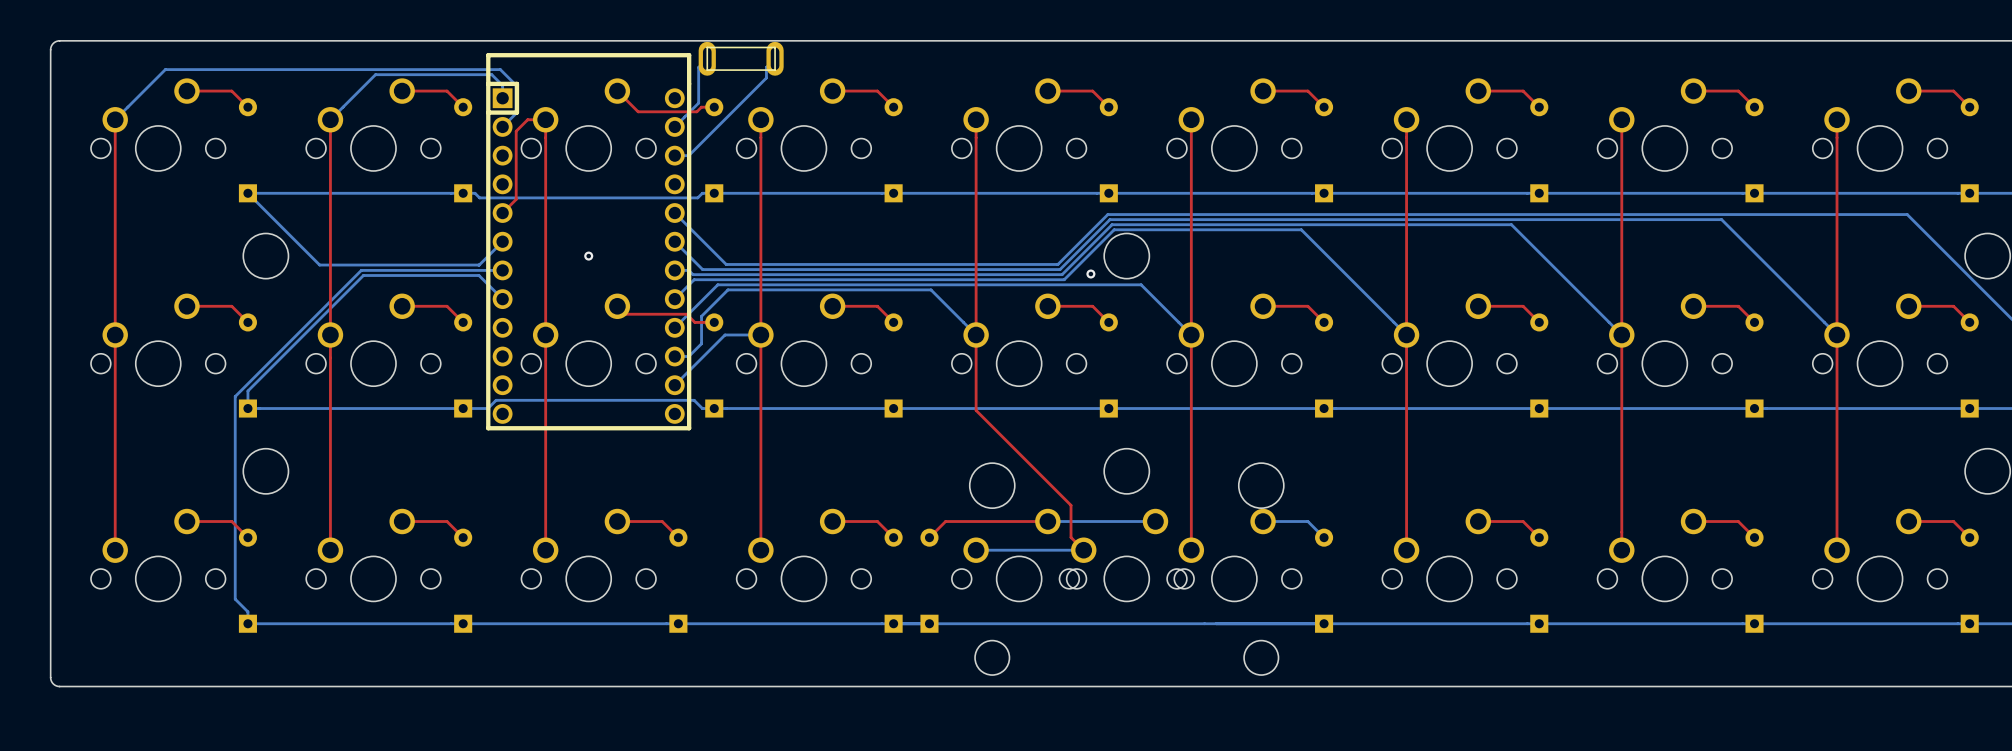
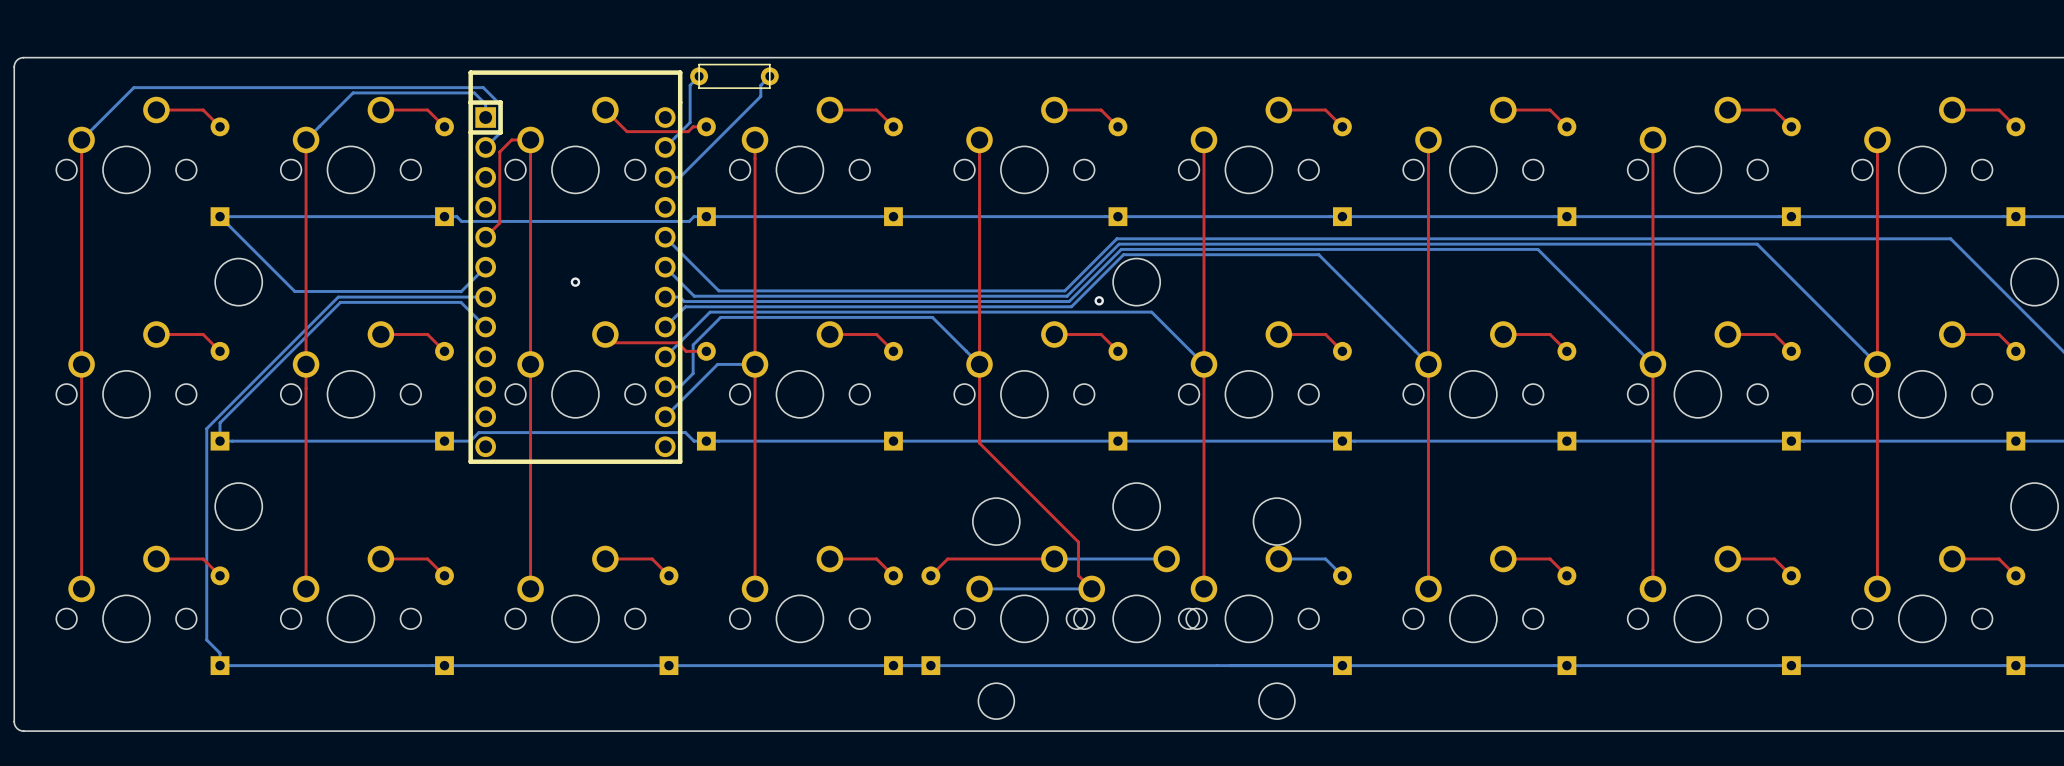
part footprint: [698, 41, 784, 76] -> [690, 63, 779, 89]

